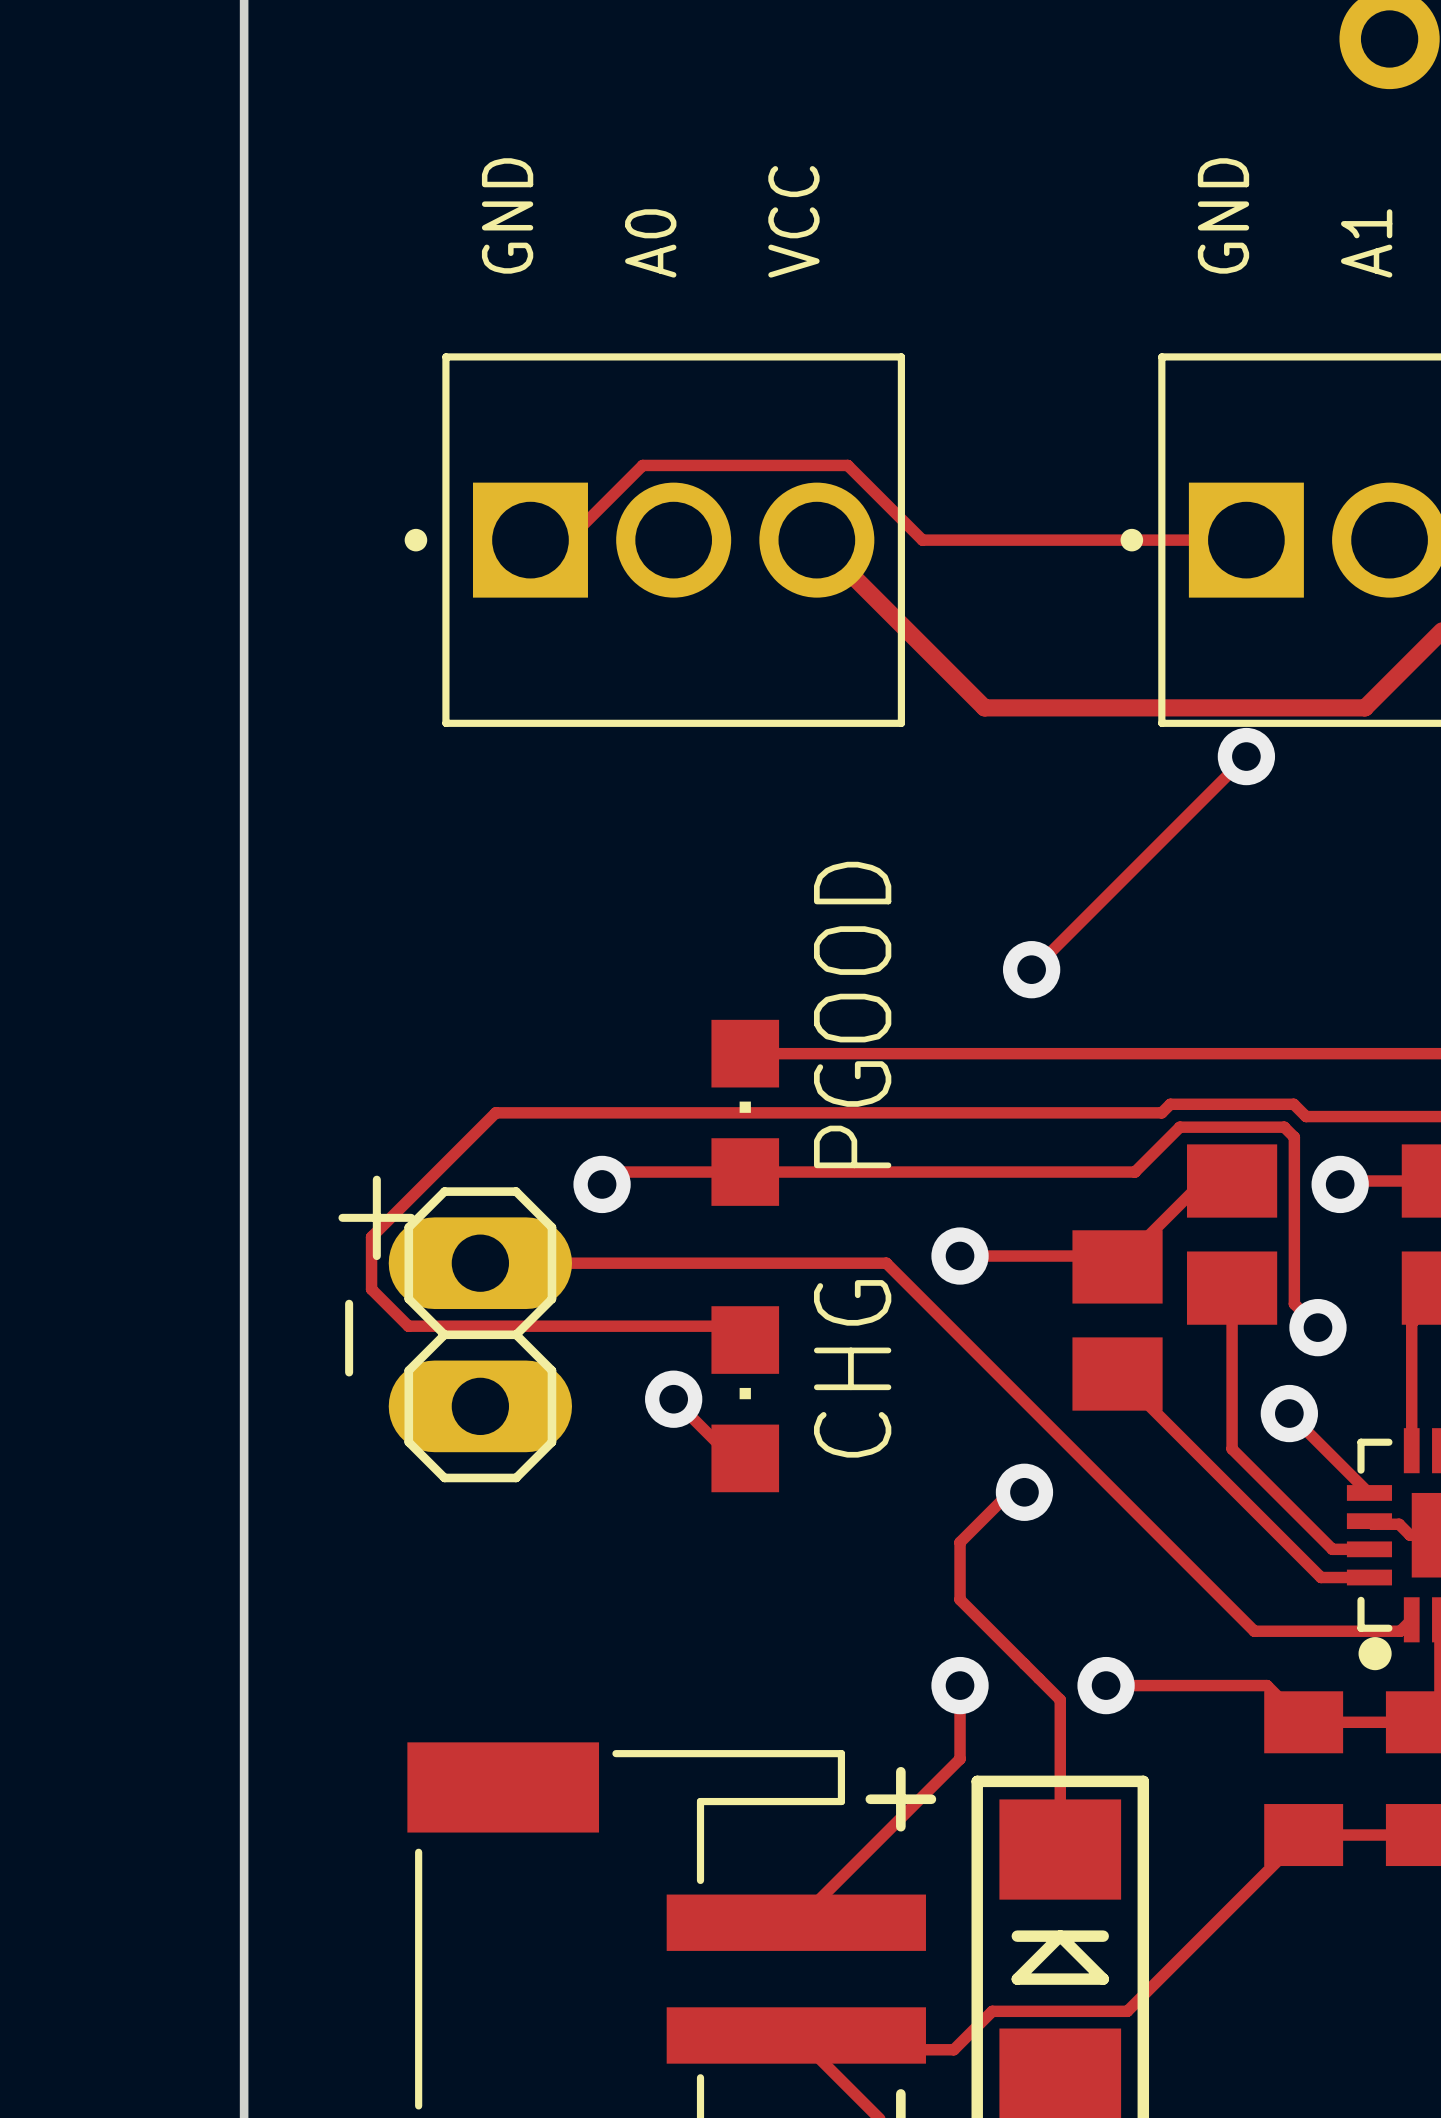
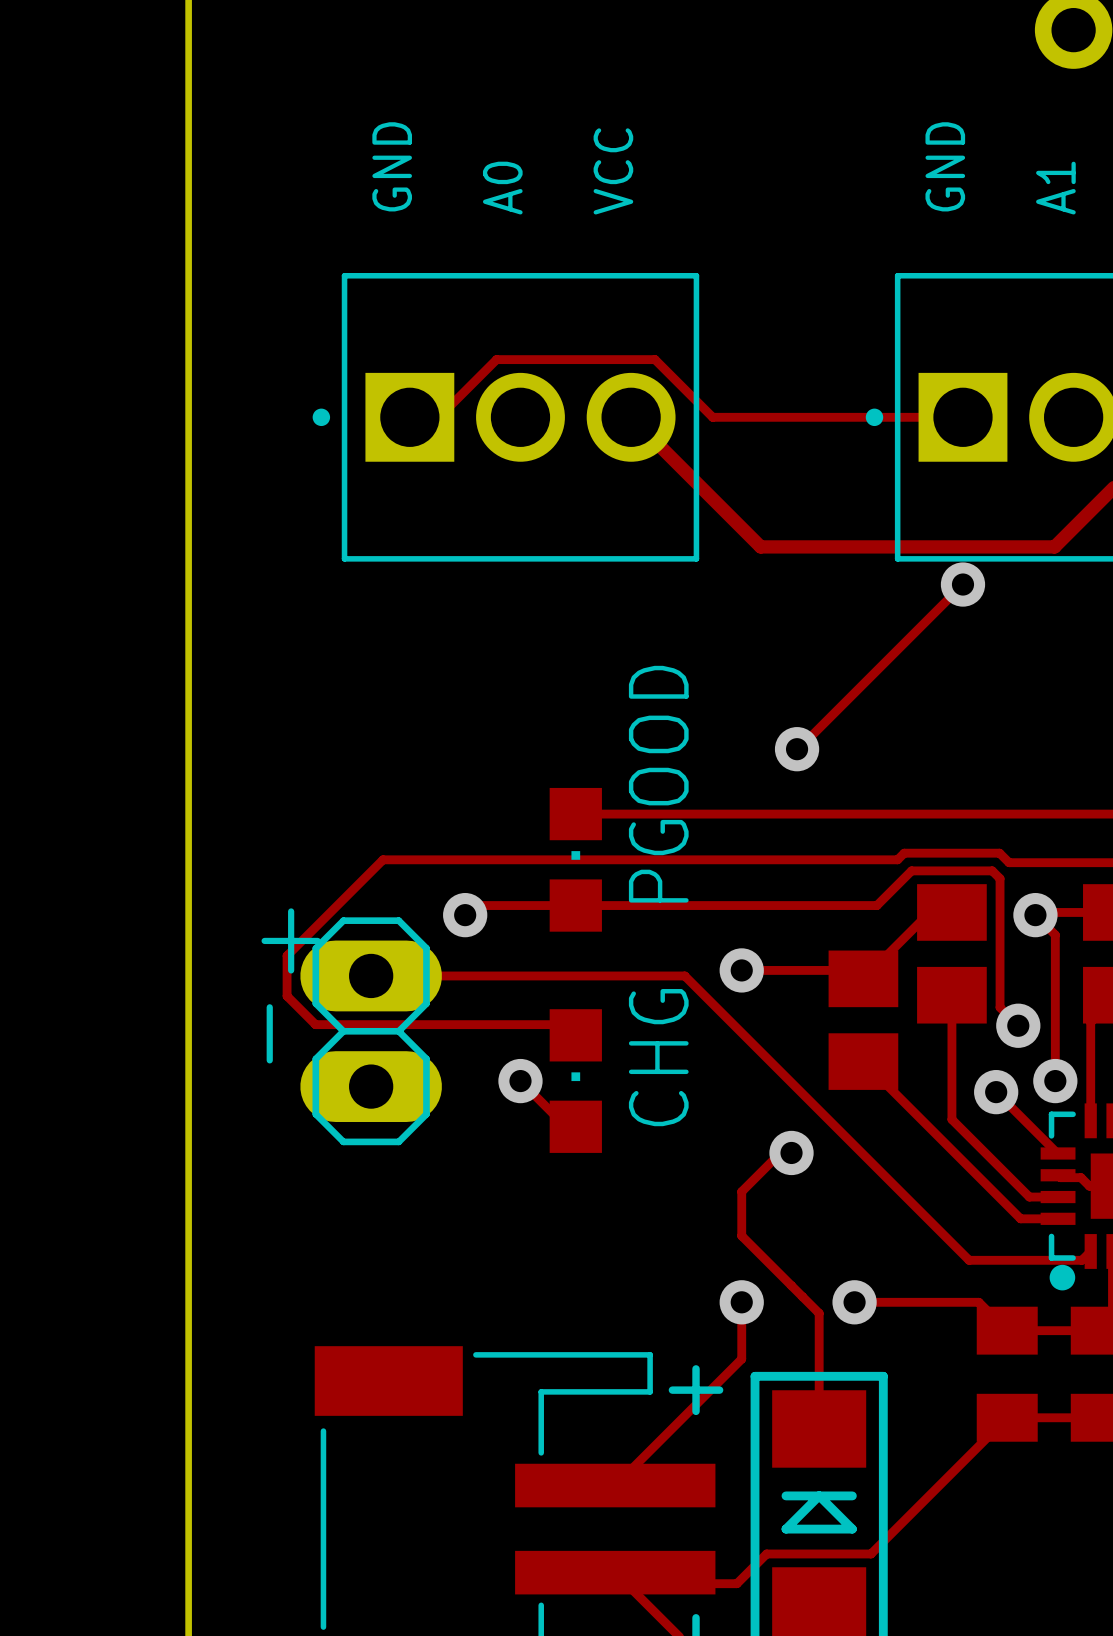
track: none -> (1035, 915) (1055, 935) (1055, 1081)
via: none -> (1055, 1081)

